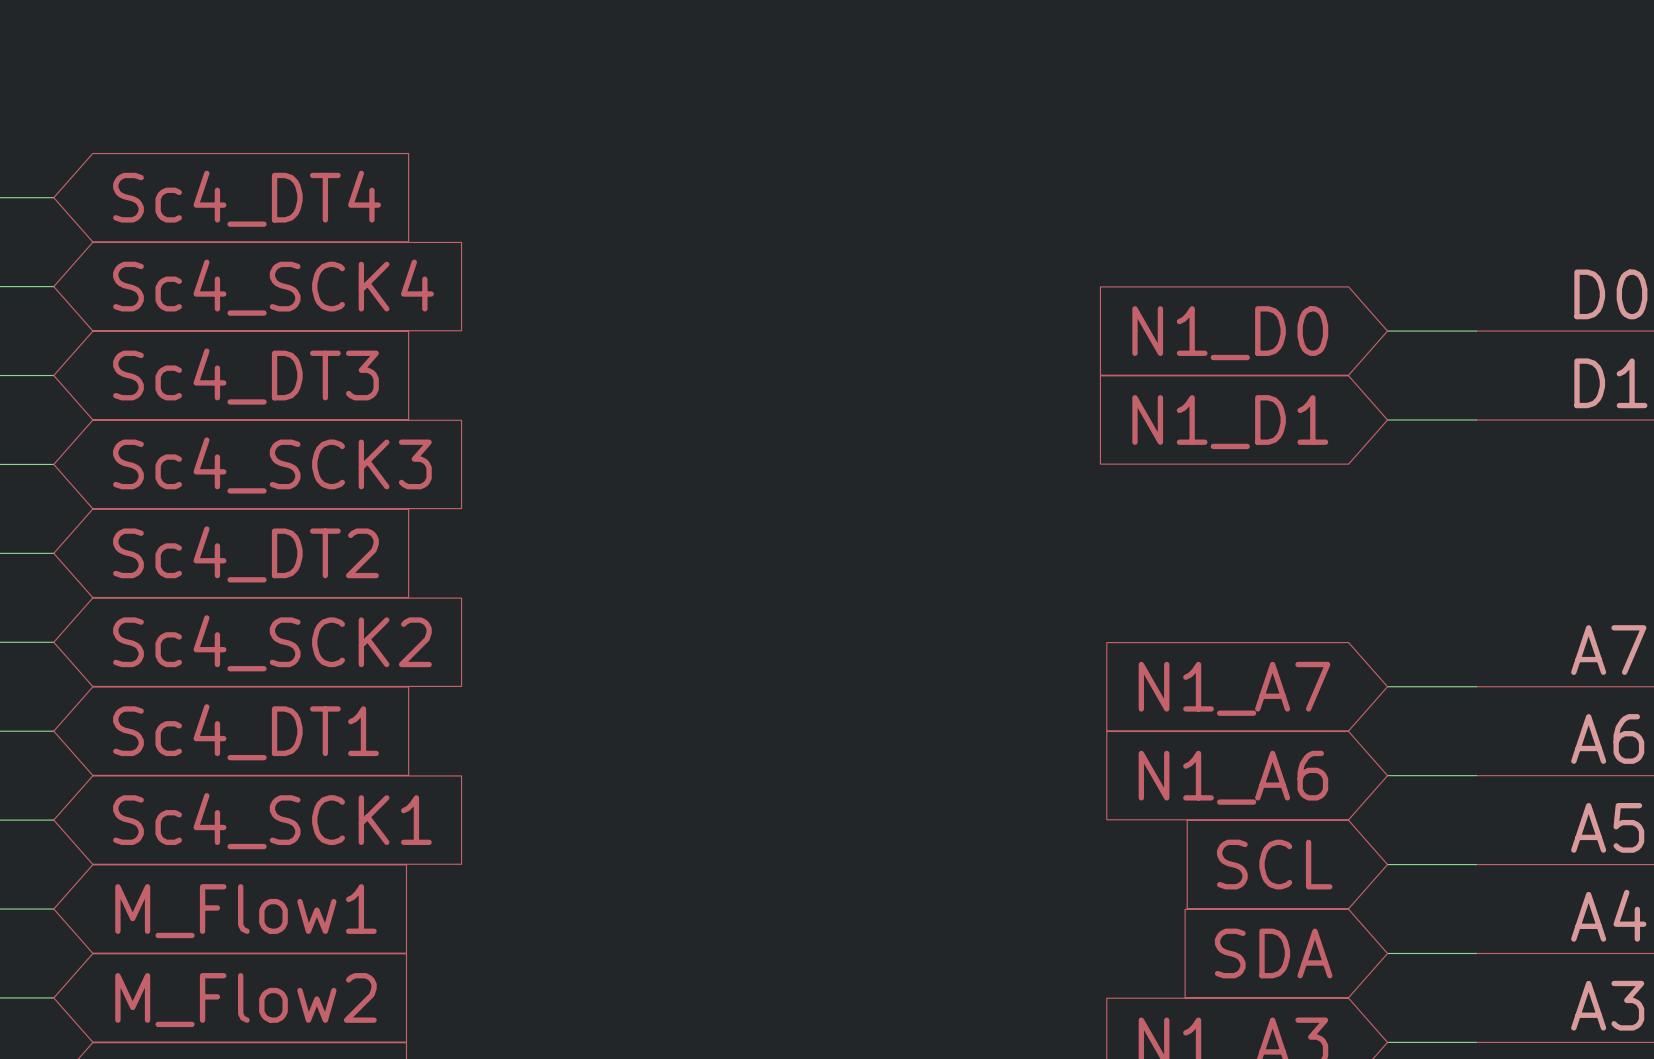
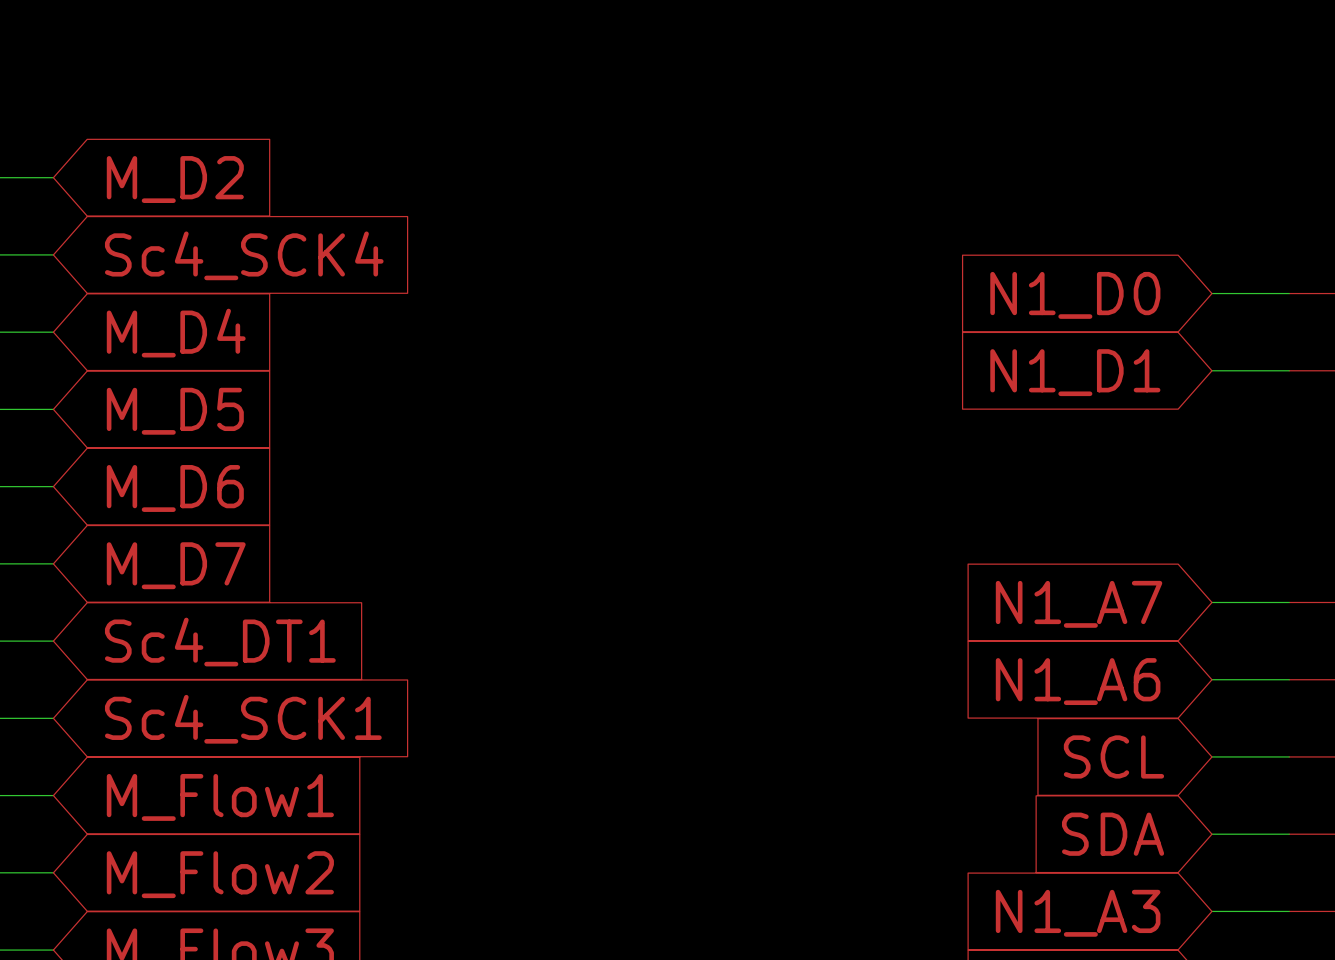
global label: Sc4_DT4 (247, 198) -> M_D2 (175, 179)
global label: Sc4_DT3 (245, 376) -> M_D4 (176, 333)
global label: Sc4_SCK3 (272, 465) -> M_D5 (175, 411)
global label: Sc4_DT2 (245, 554) -> M_D6 (175, 488)
global label: Sc4_SCK2 (272, 643) -> M_D7 (176, 565)

